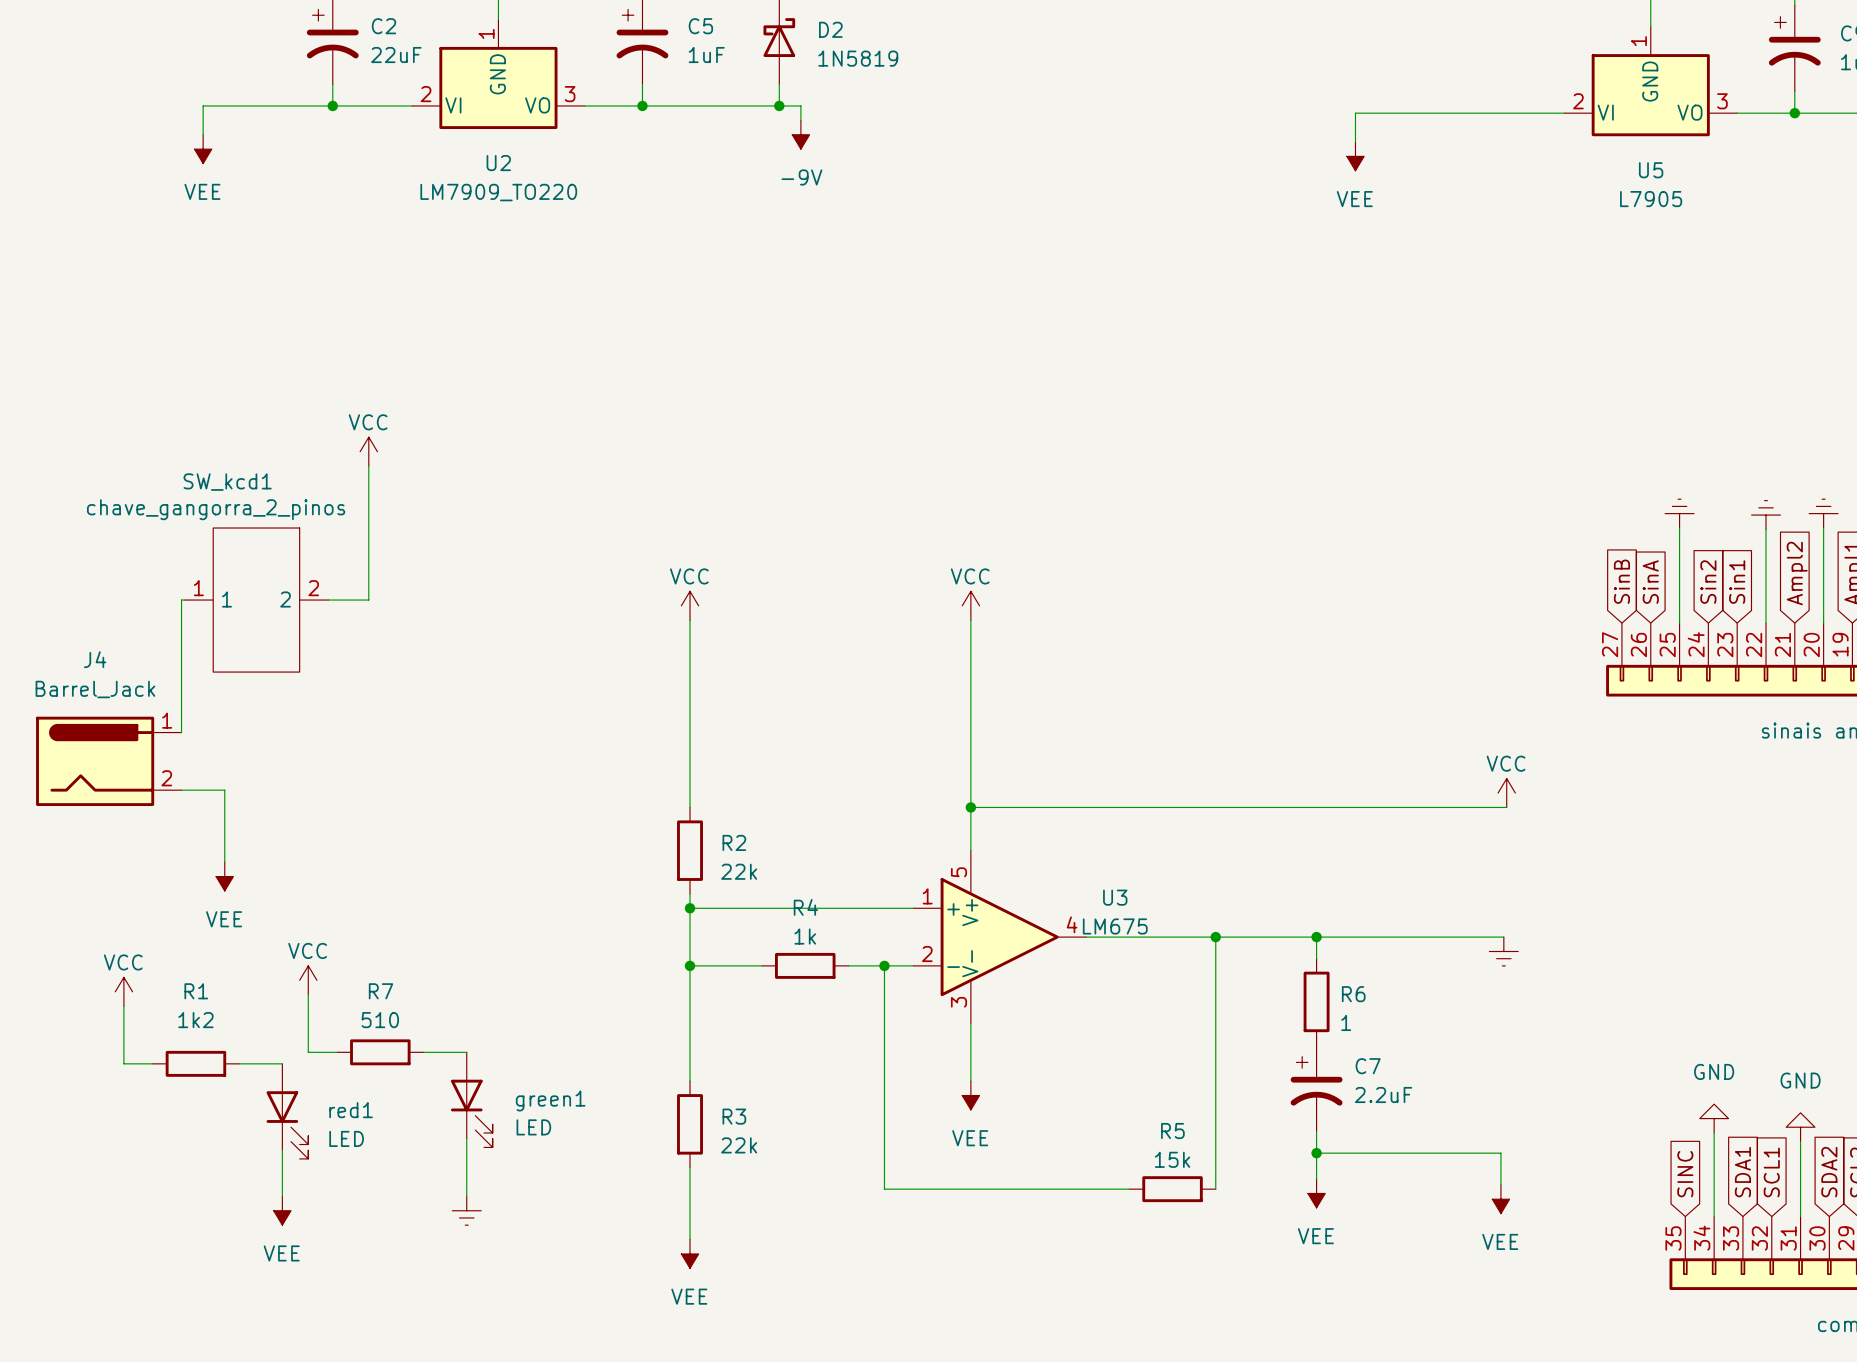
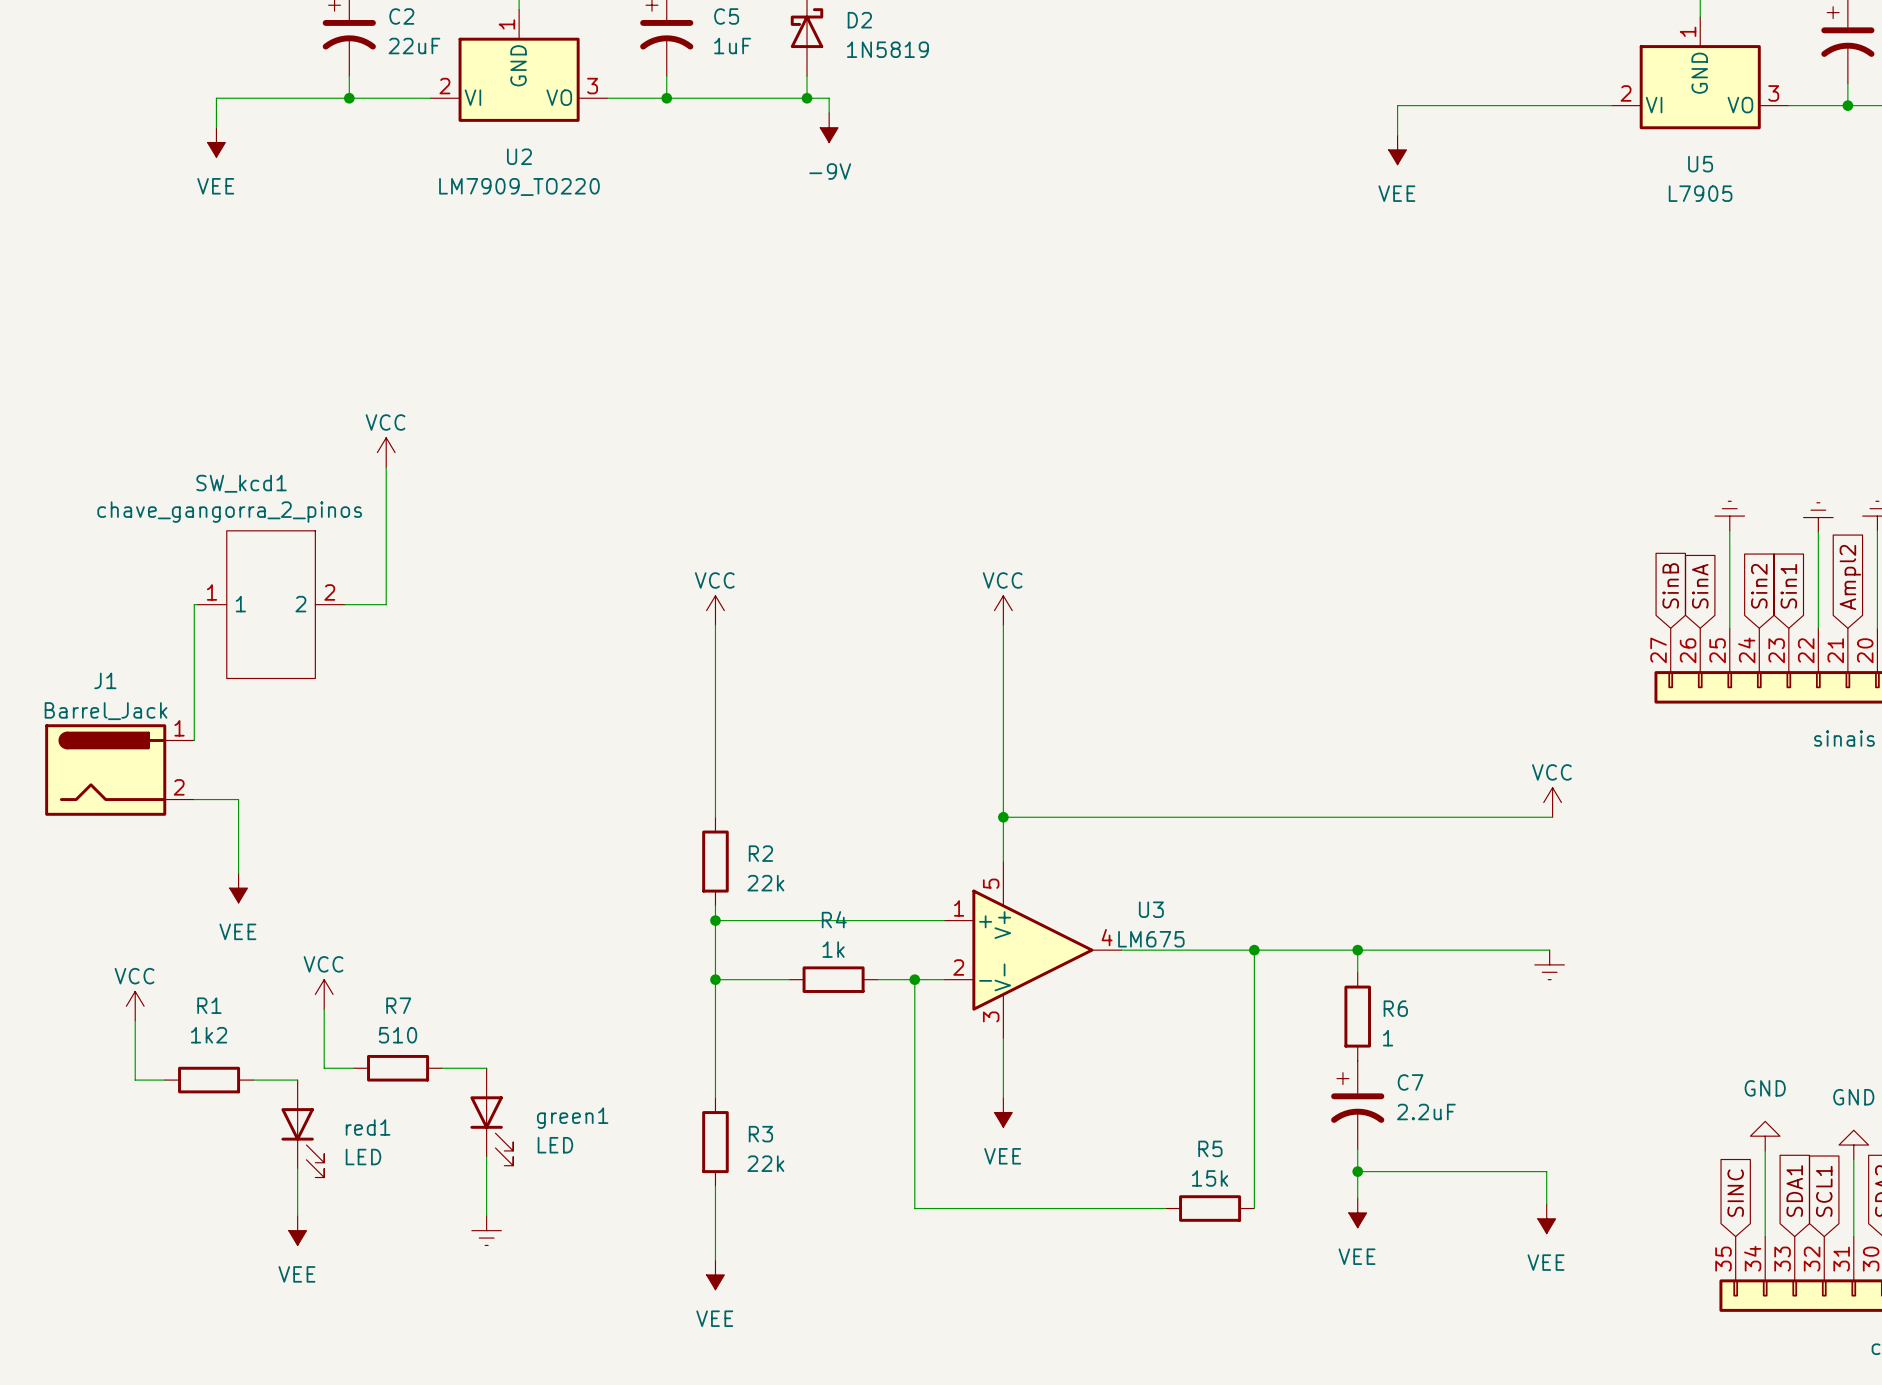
J4 name: J4 (95, 659) -> J1 (105, 680)
J4 value position: Barrel_Jack (95, 689) -> Barrel_Jack (106, 711)

